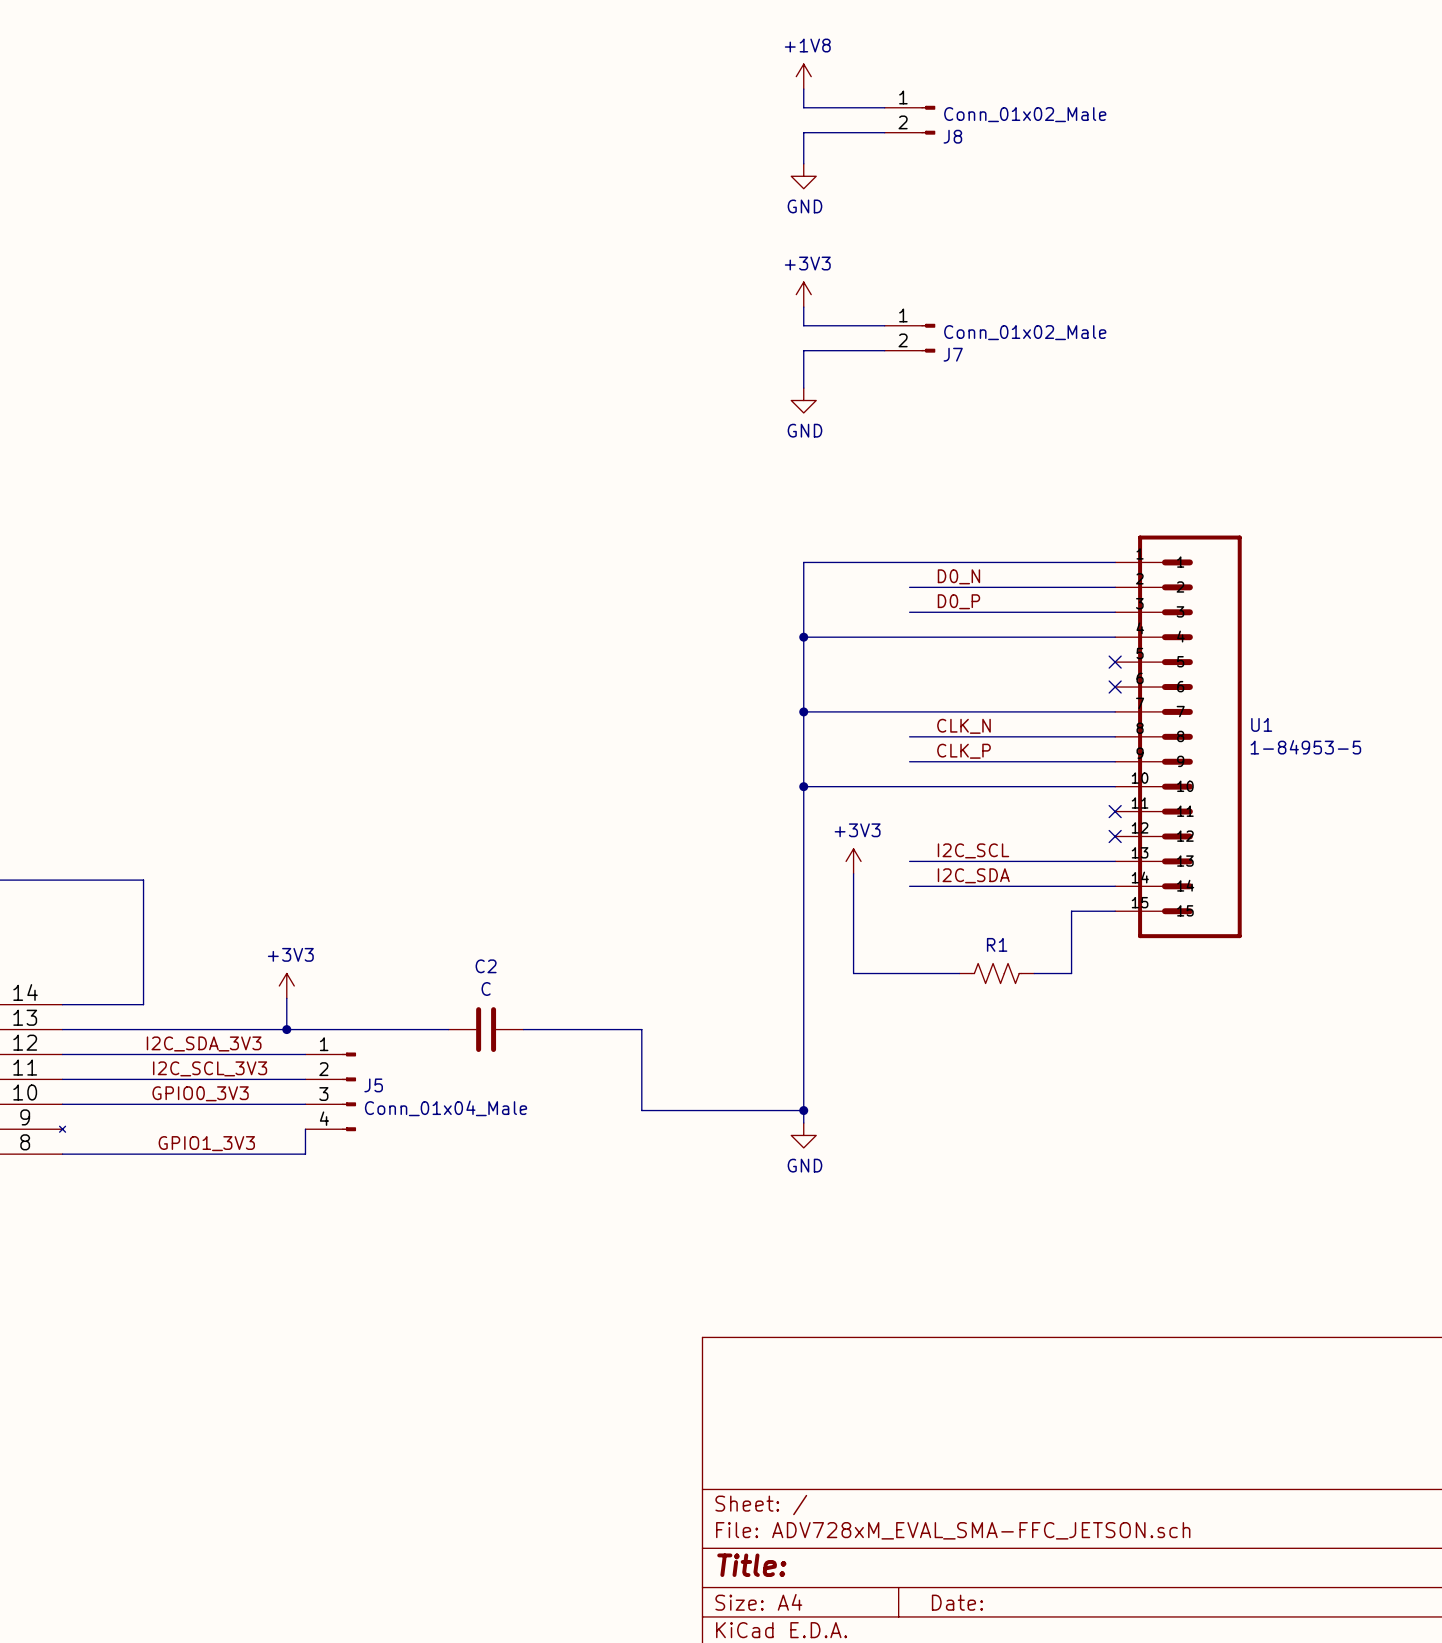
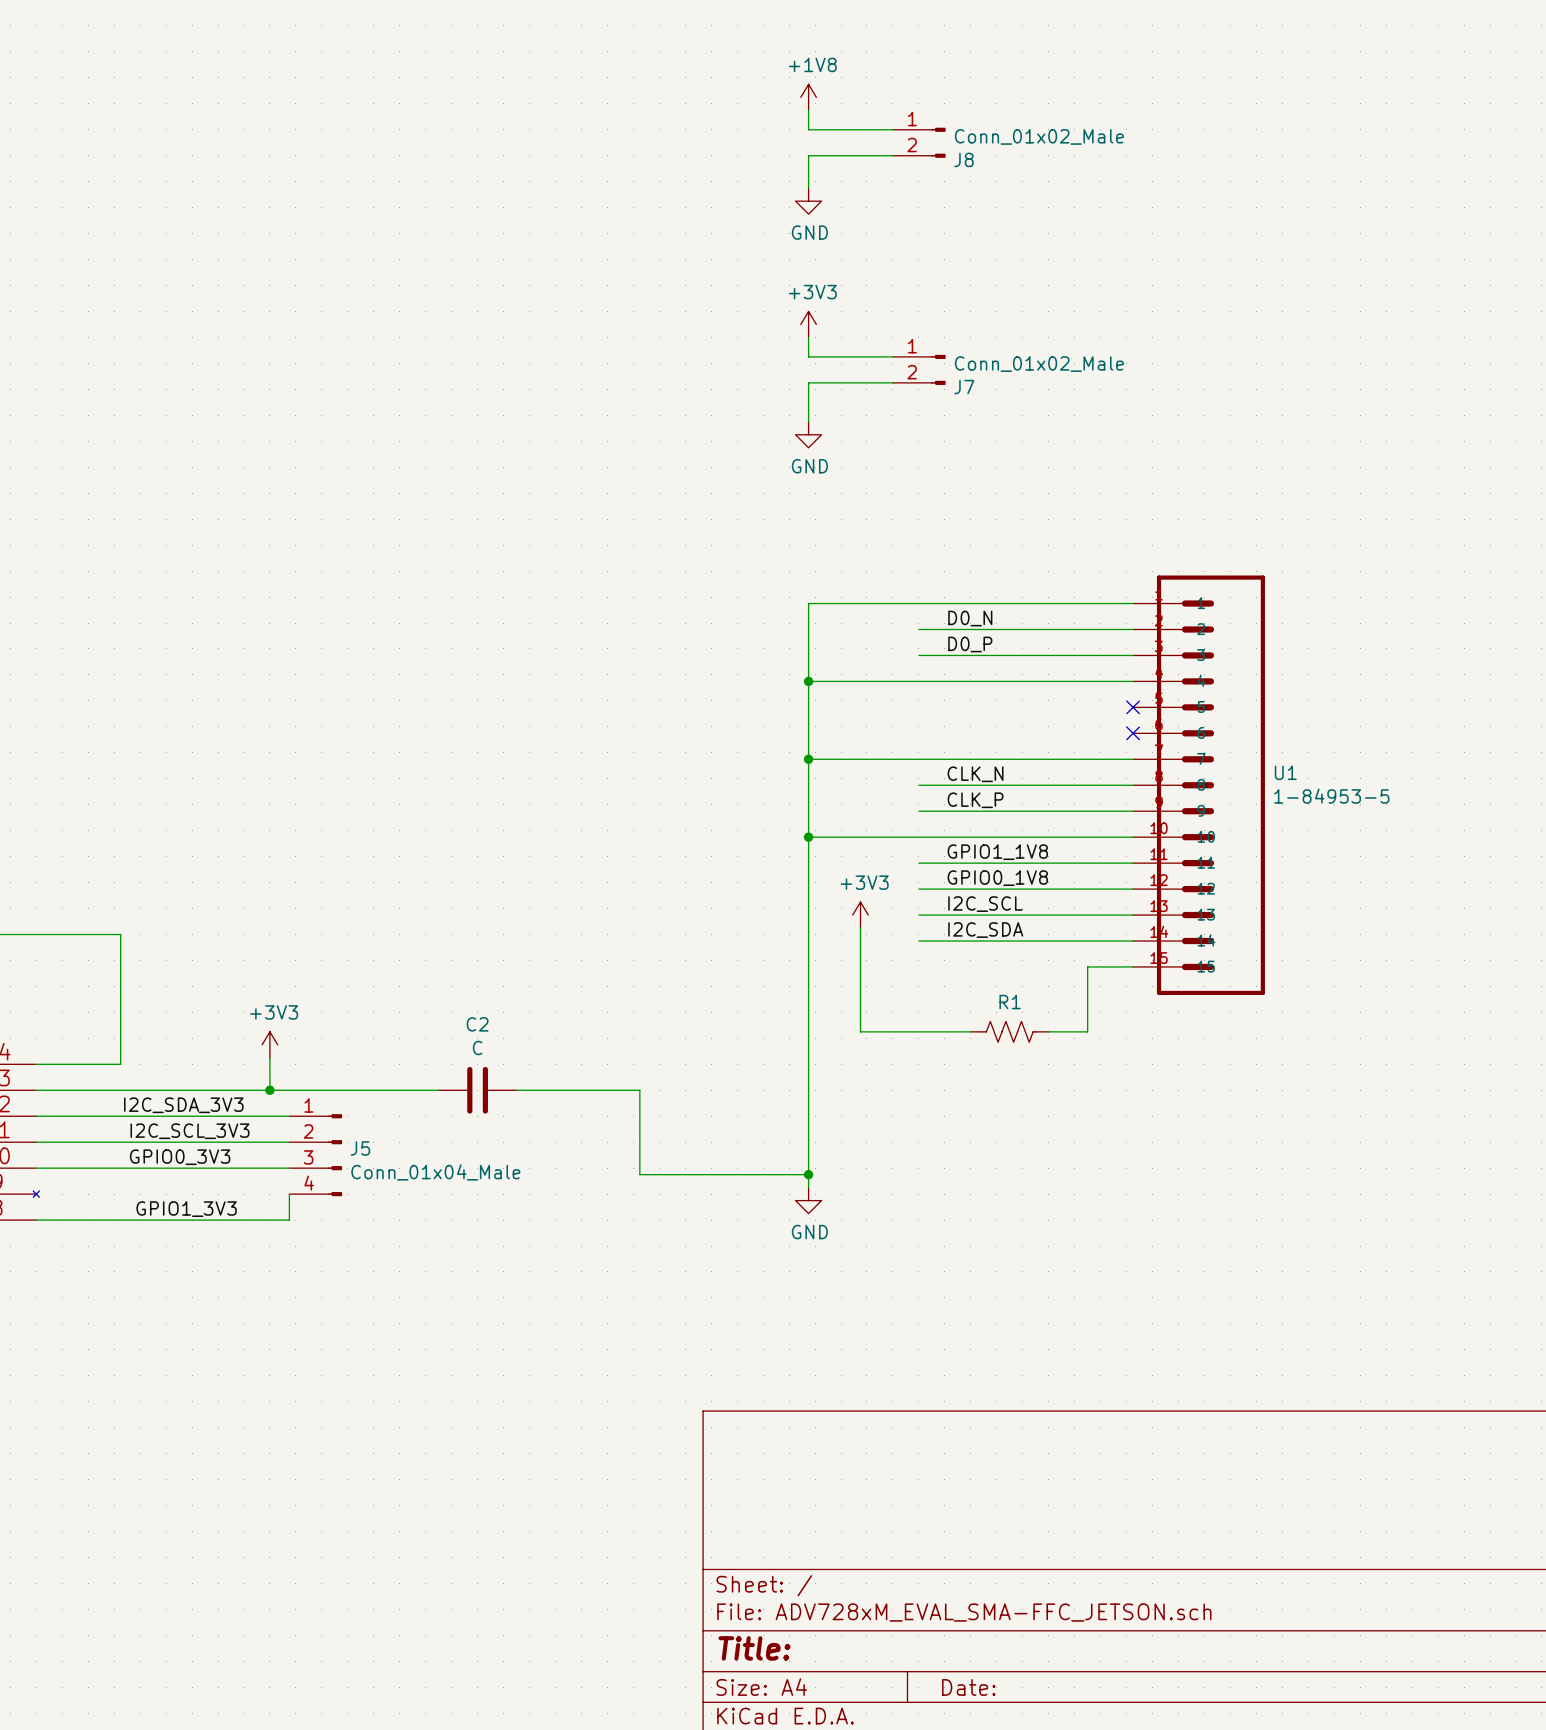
label: none -> GPIO1_1V8 (997, 852)
wire: none -> (918, 863) (1133, 863)
no-connect mark: (1115, 811) -> none
label: none -> GPIO0_1V8 (997, 878)
wire: none -> (918, 889) (1133, 889)
no-connect mark: (1115, 836) -> none

